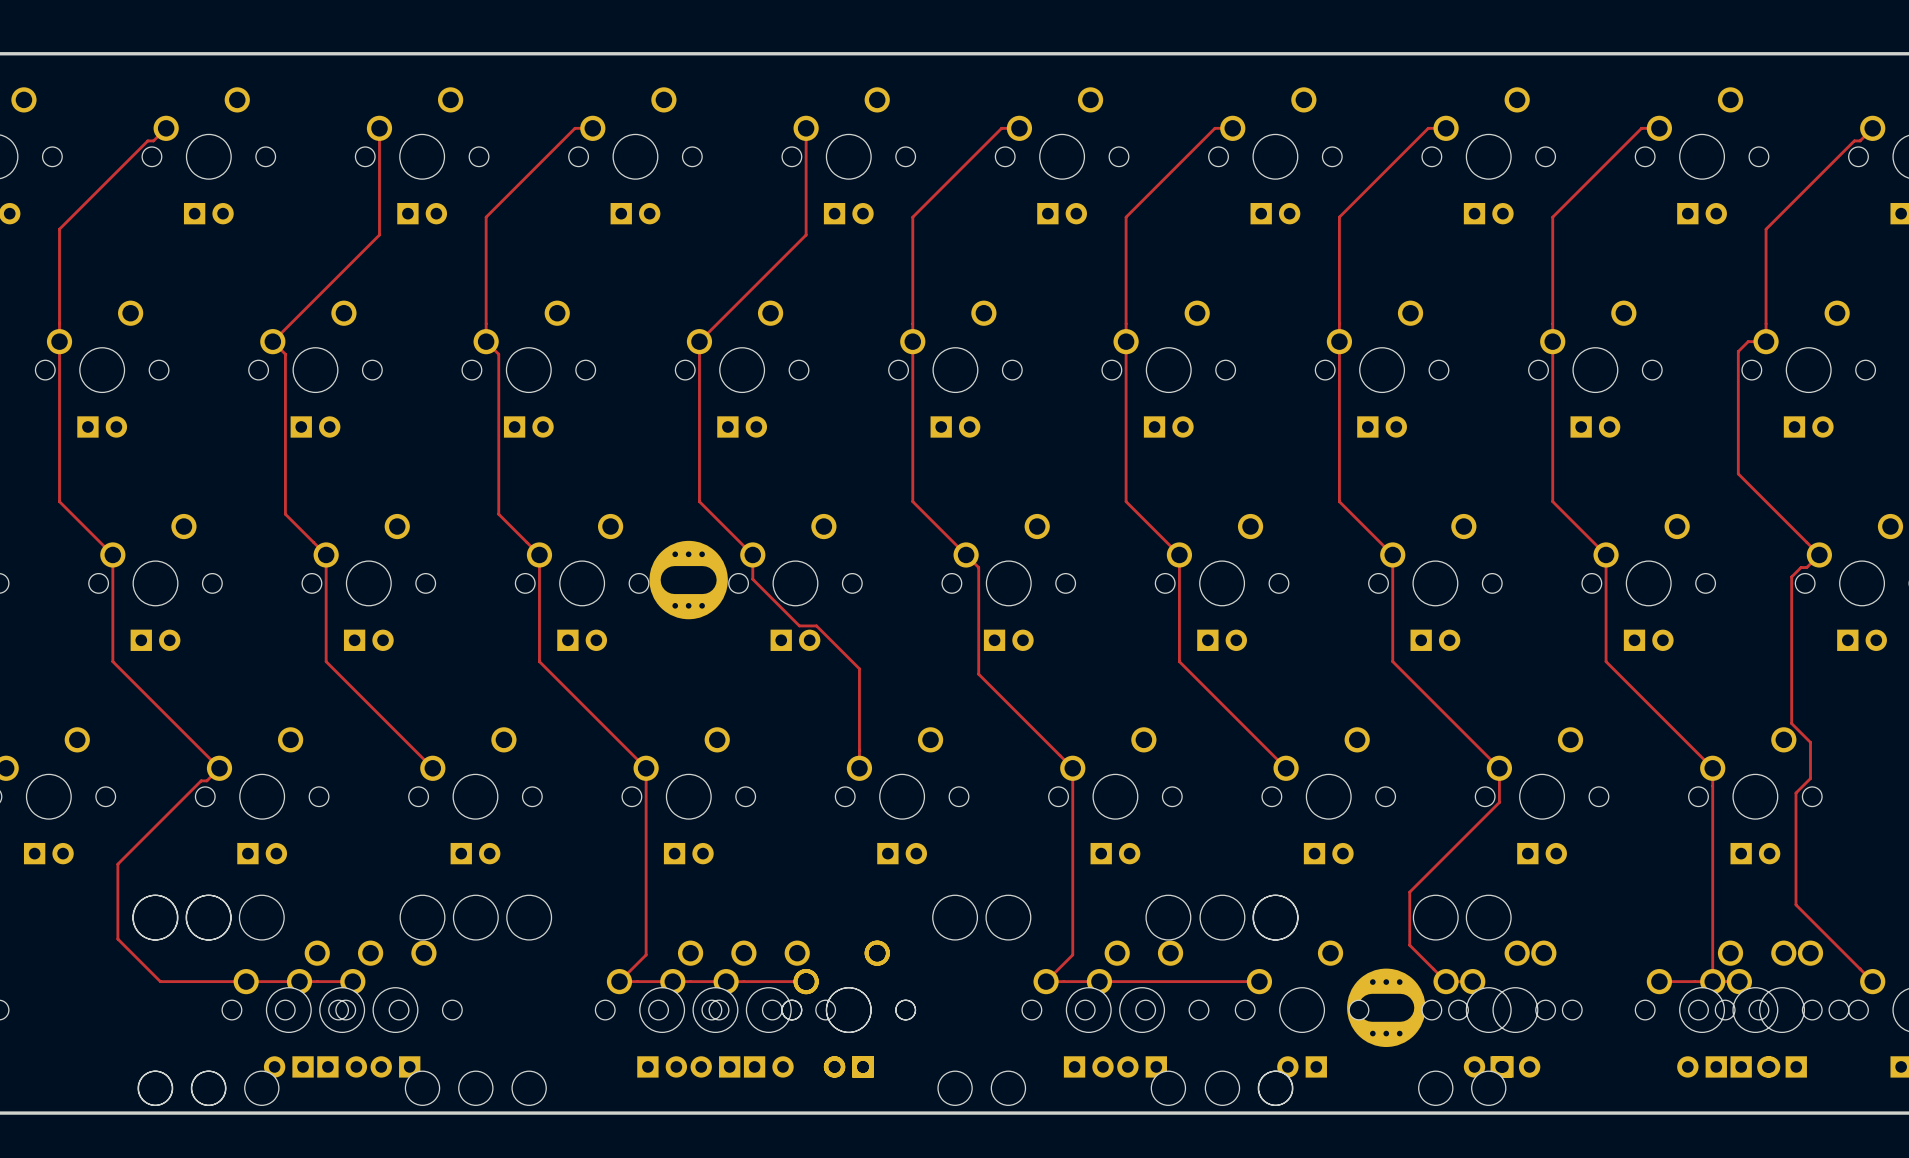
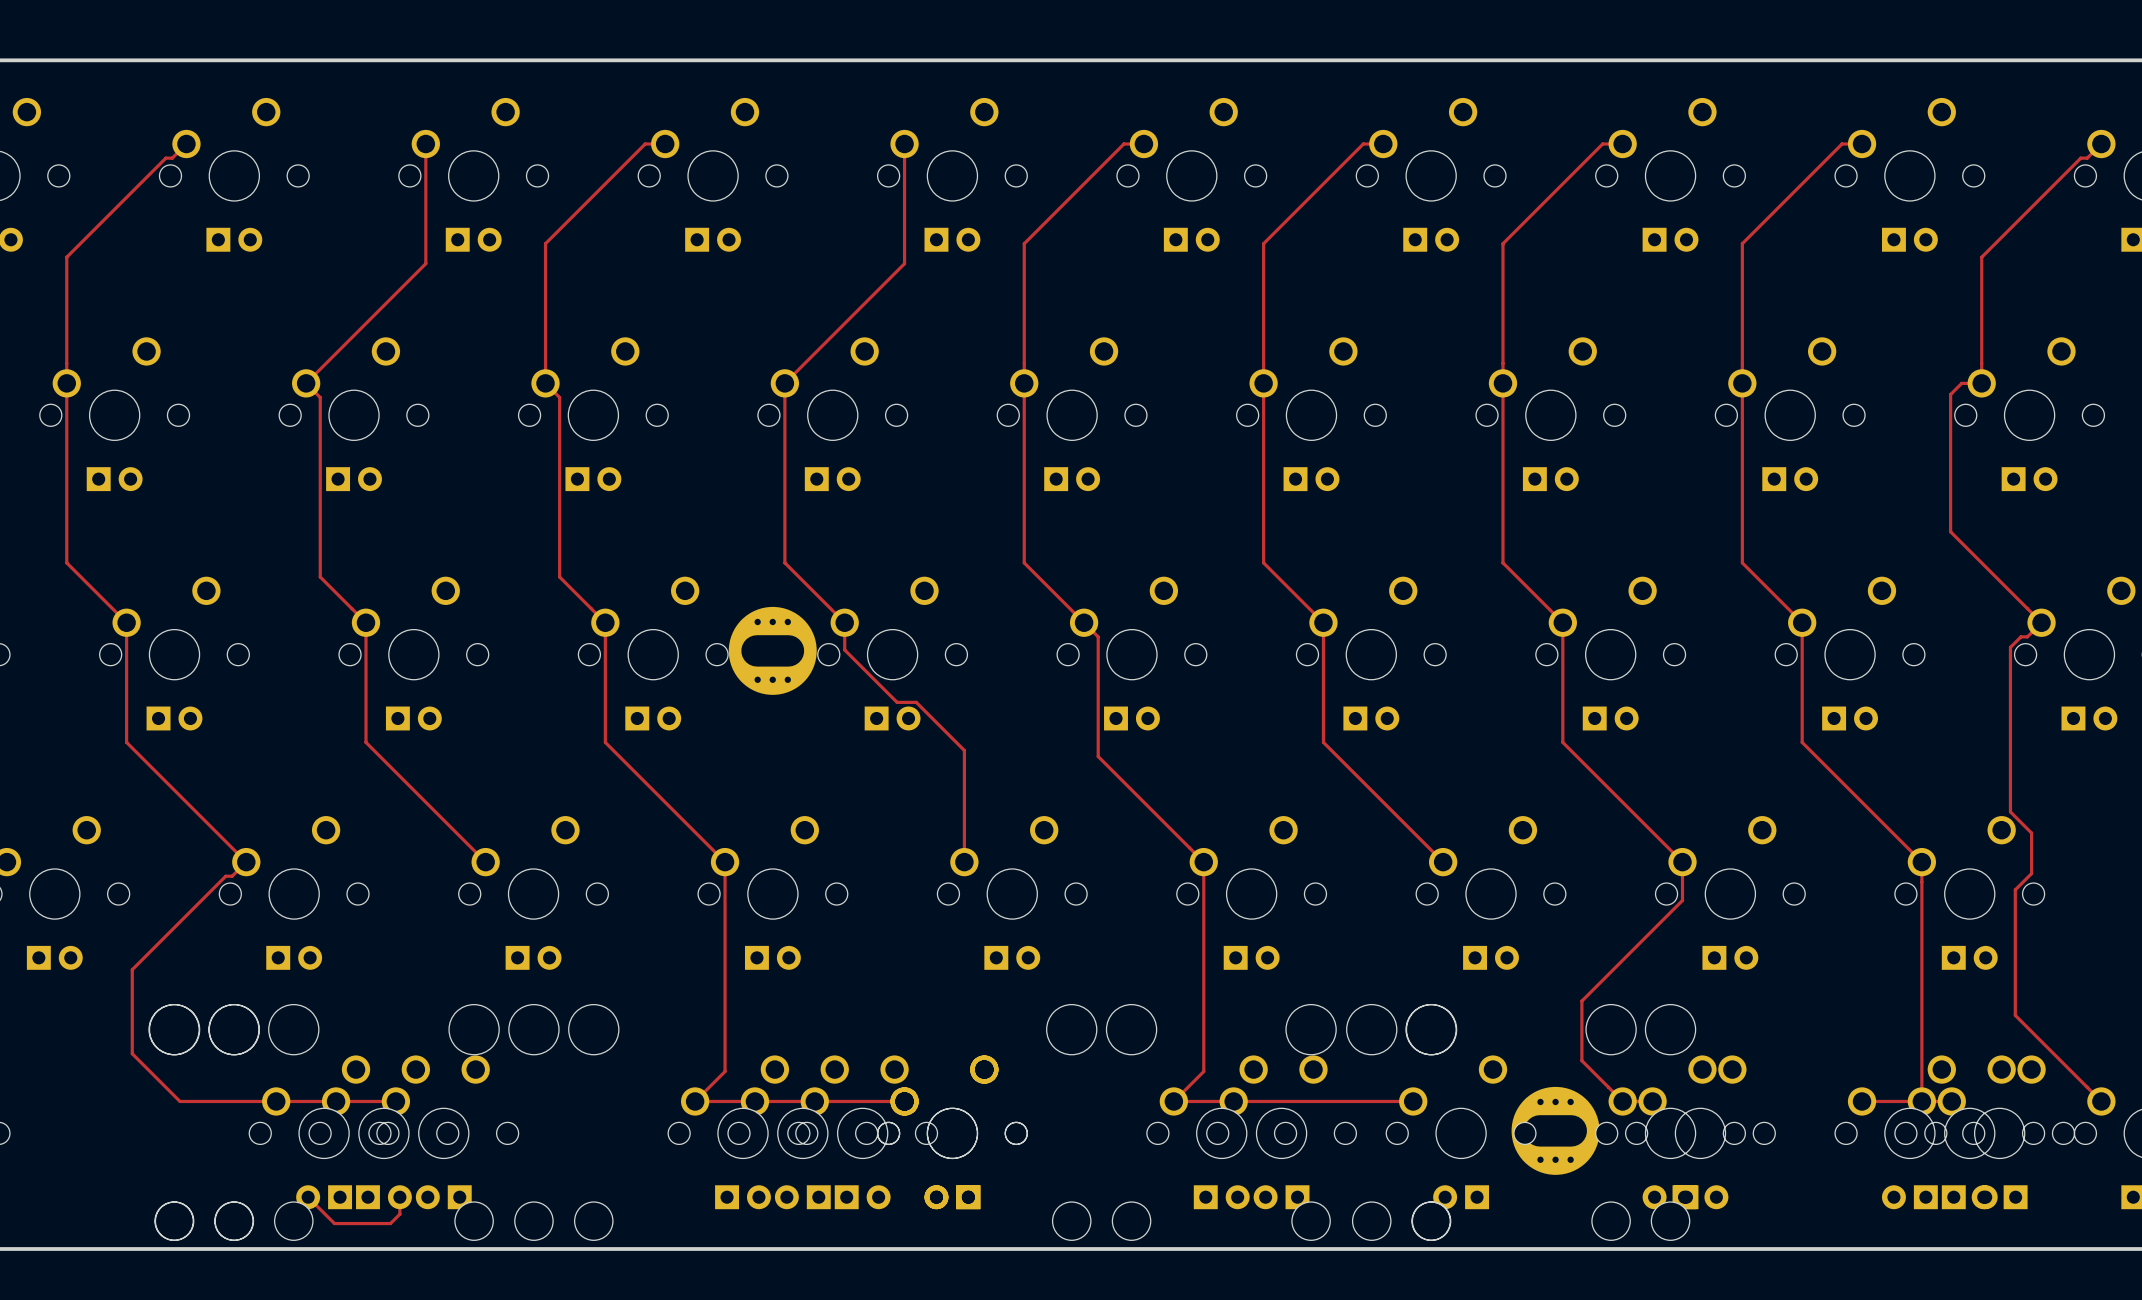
track: none -> (308, 1197) (334, 1223) (390, 1223) (399, 1214) (399, 1197)

